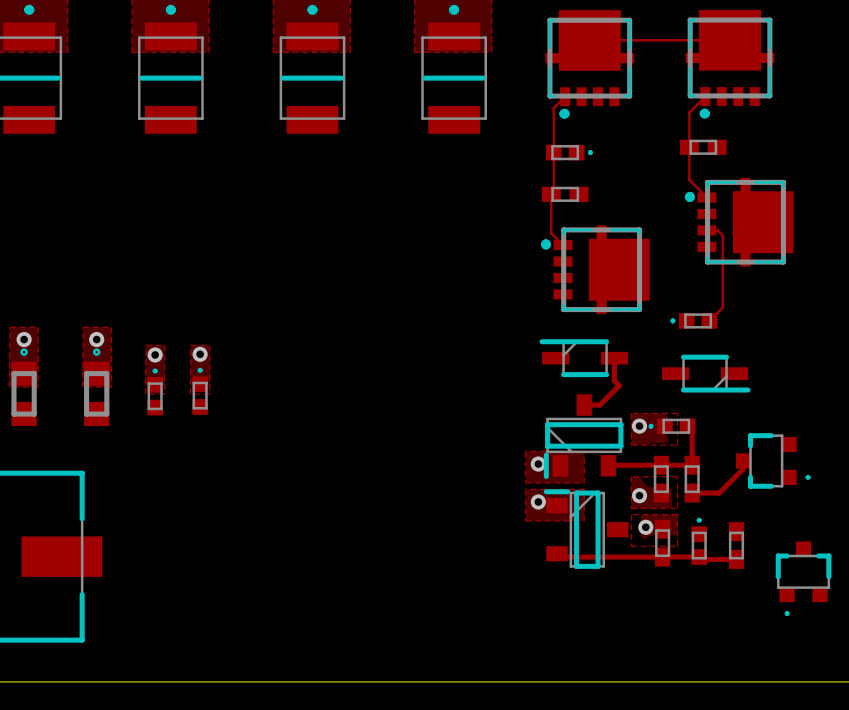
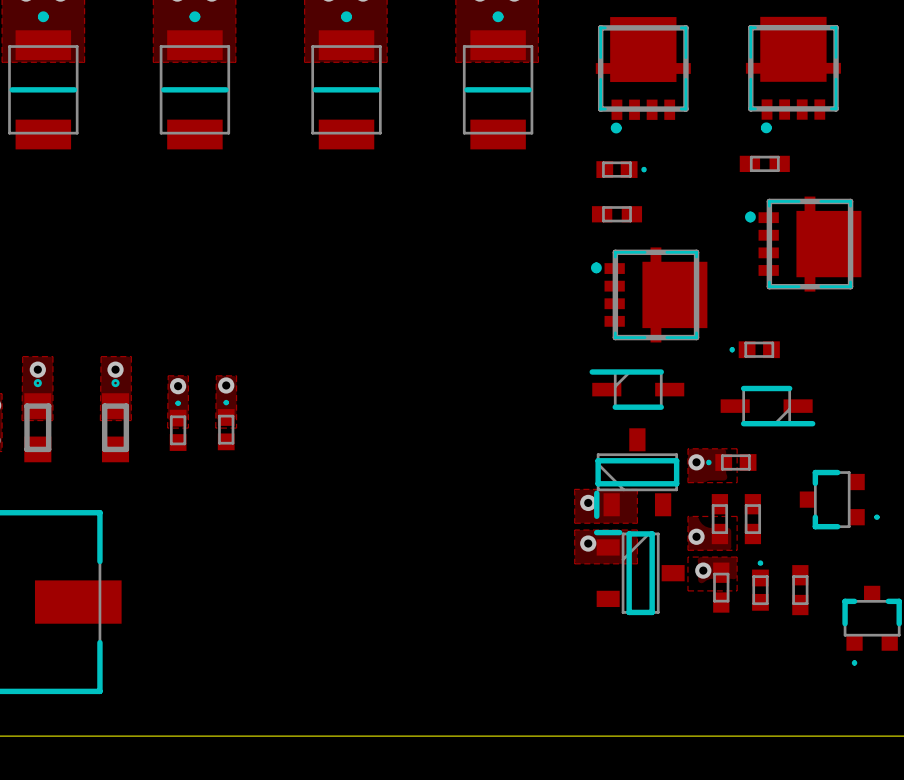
top track: (589, 40) (730, 40) -> none
top track: (598, 96) (565, 96) (553, 108) (553, 191) (551, 194) (551, 233) (563, 245) (563, 277) -> none
top track: (738, 96) (705, 96) (689, 112) (689, 180) (706, 197) (706, 230) (717, 230) (722, 235) (722, 307) (709, 320) -> none
top track: (614, 358) (614, 380) (619, 385) (599, 405) (584, 405) -> none
top track: (687, 426) (692, 430) (692, 465) (608, 465) -> none
top track: (742, 460) (742, 469) (719, 493) (692, 493) -> none
top track: (556, 553) (560, 557) (662, 557) -> none
top track: (662, 556) (736, 559) -> none

